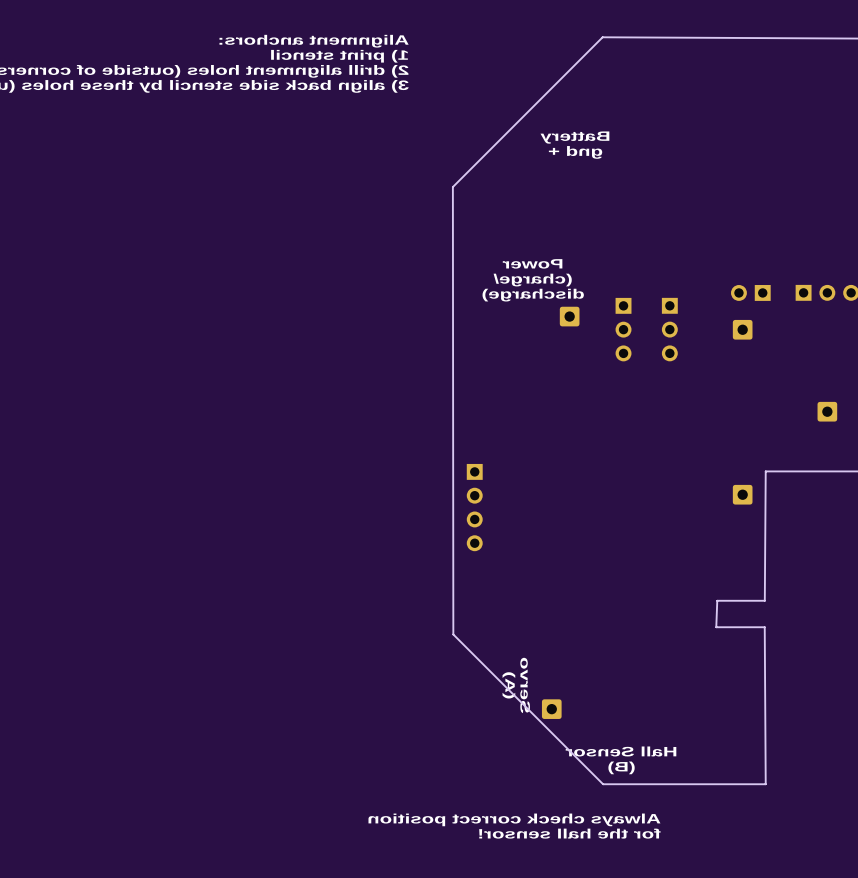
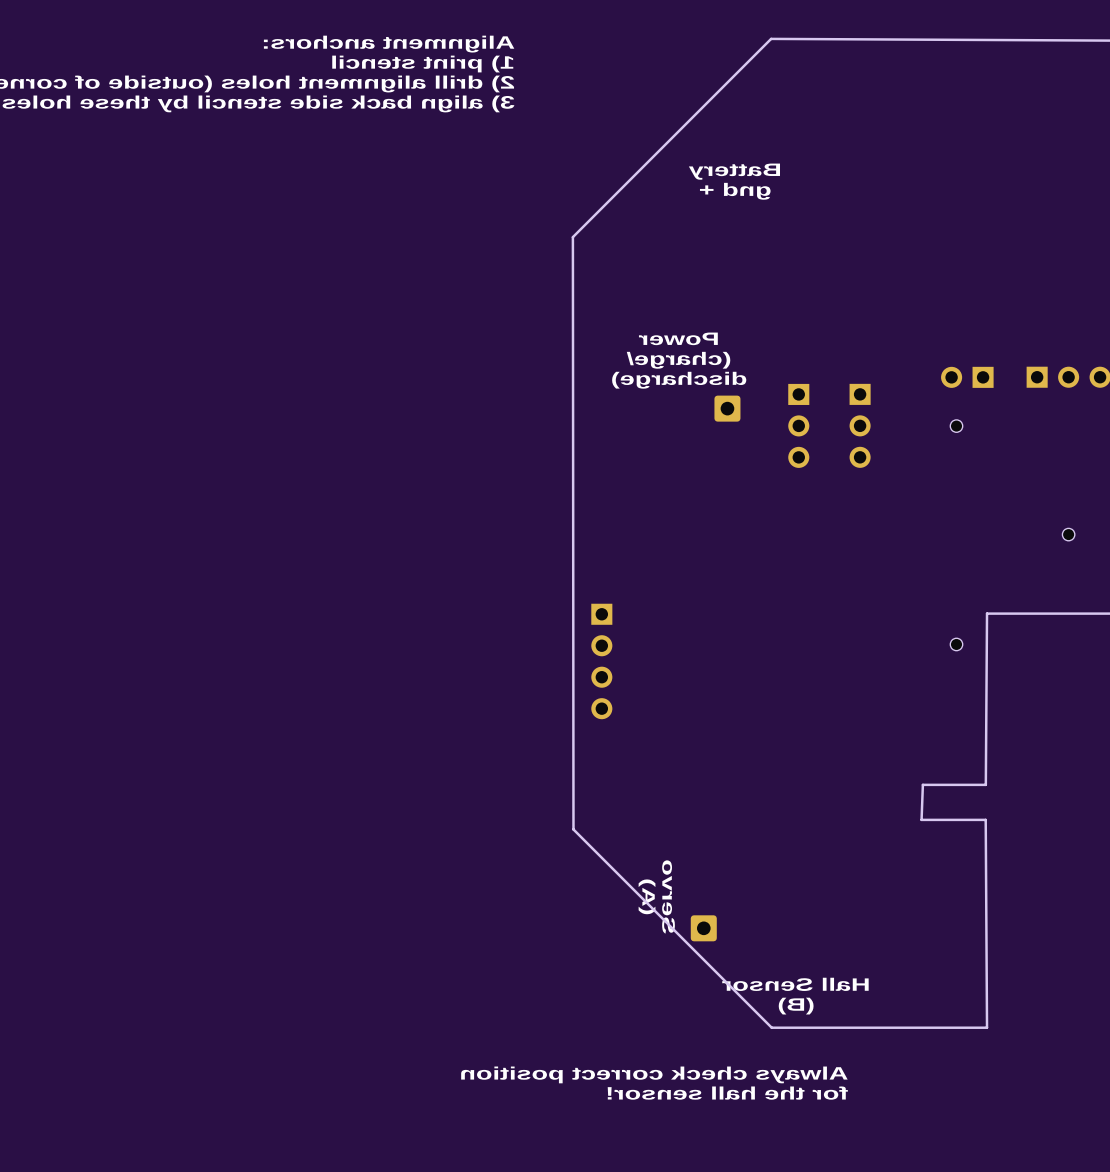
part footprint: [732, 319, 753, 340] -> [950, 419, 963, 433]
part footprint: [817, 401, 838, 422] -> [1062, 528, 1075, 541]
part footprint: [732, 484, 753, 505] -> [950, 638, 963, 651]

